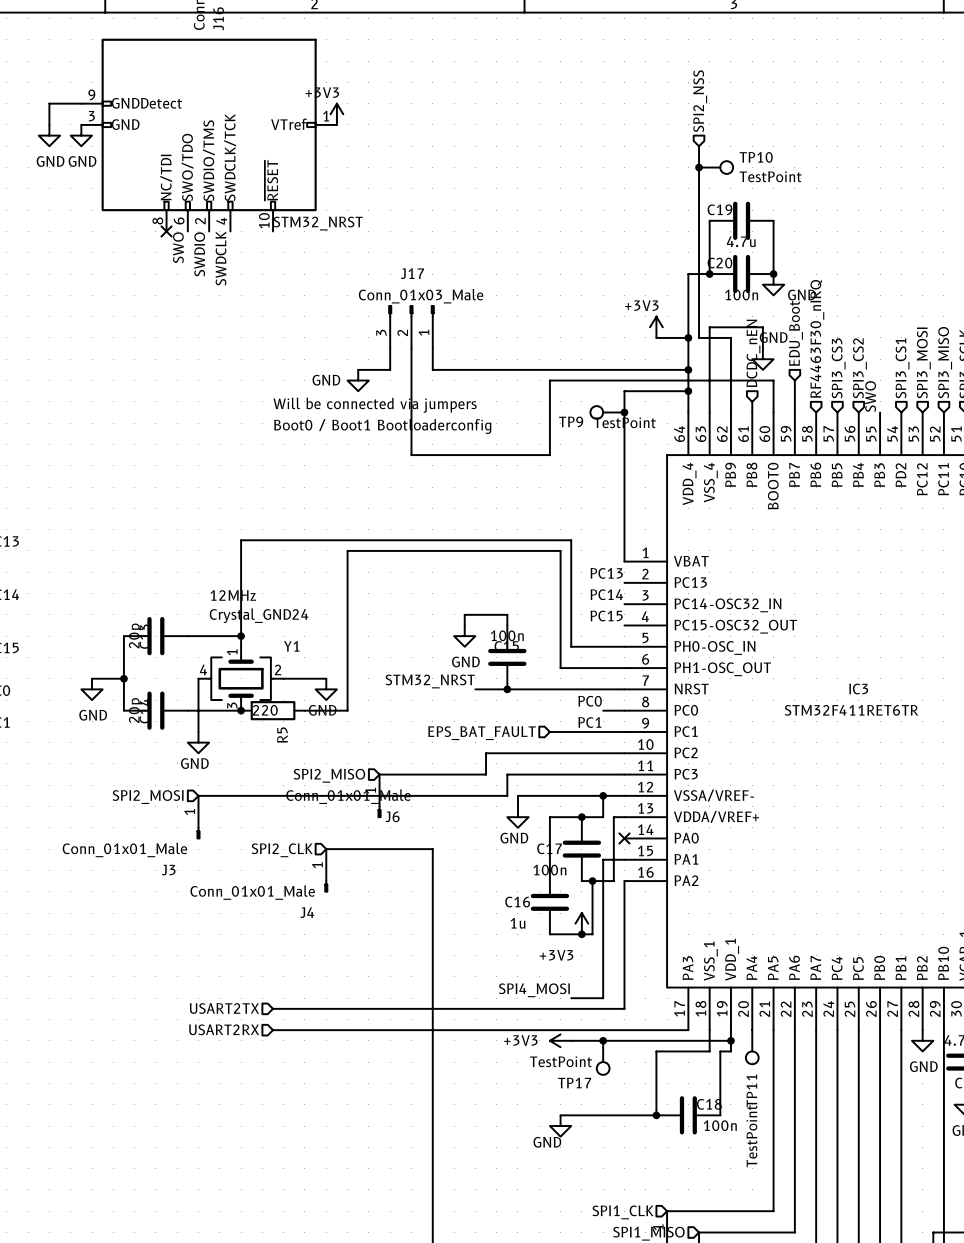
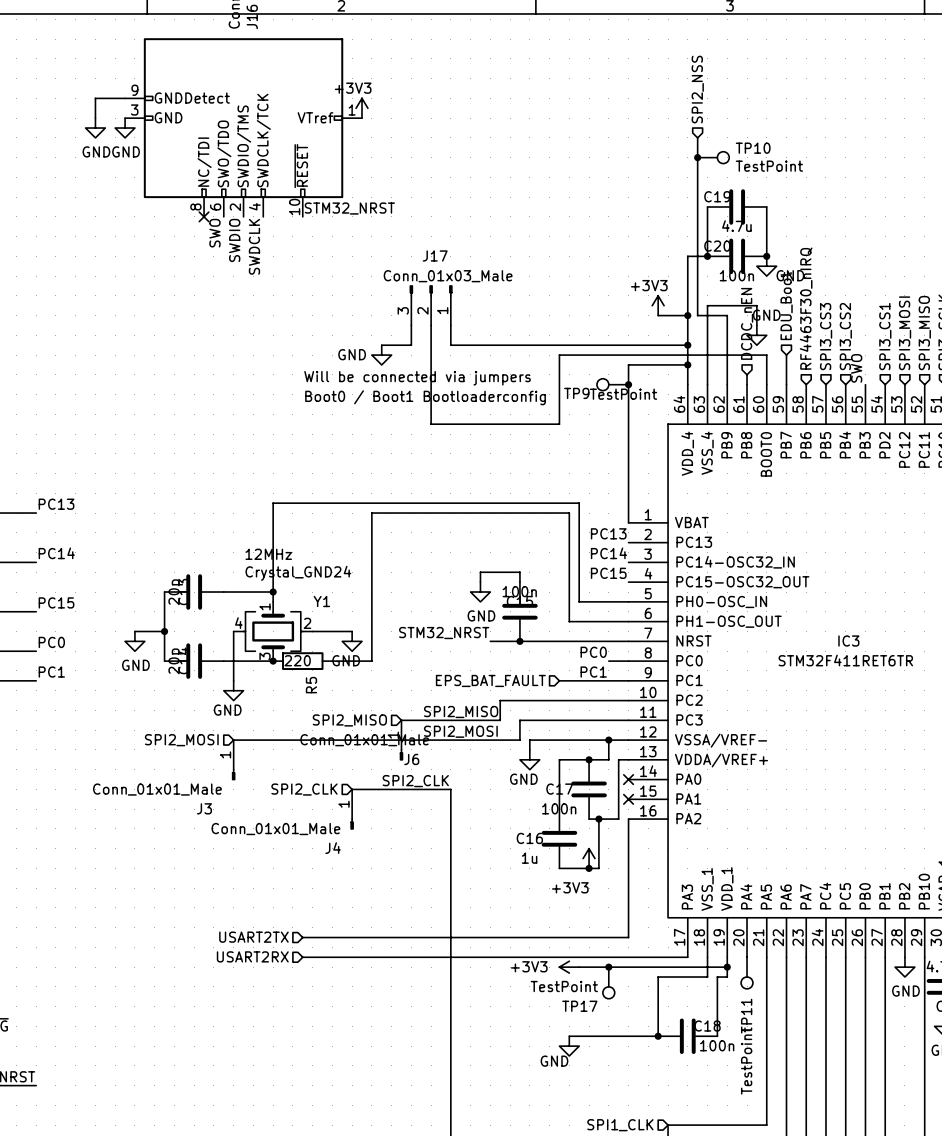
label: none -> SPI2_MISO (461, 712)
label: none -> SPI2_MOSI (460, 731)
label: none -> SPI2_CLK (415, 781)
wire: (624, 859) (603, 859) (603, 998) (571, 998) -> none
no-connect mark: none -> (628, 799)
label: SPI4_MOSI (534, 990) -> none

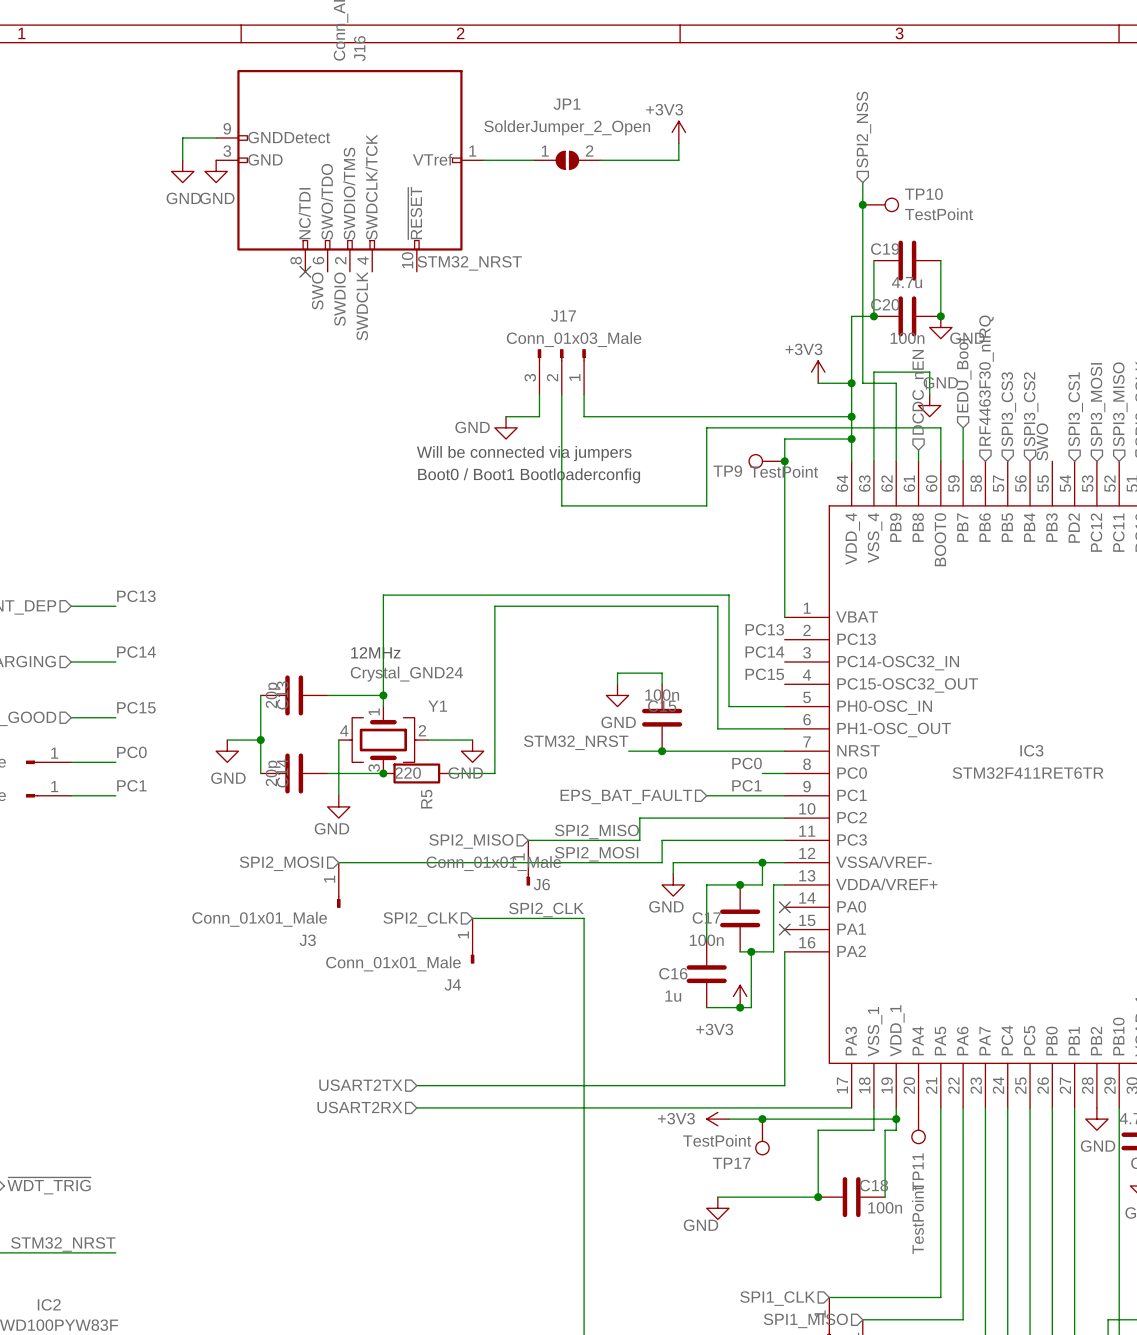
wire: none -> (678, 143) (678, 160) (600, 160)
power symbol position: +3V3 (362, 108) -> +3V3 (678, 132)
wire: none -> (483, 160) (533, 160)
JP1: none -> SolderJumper_2_Open (567, 160)

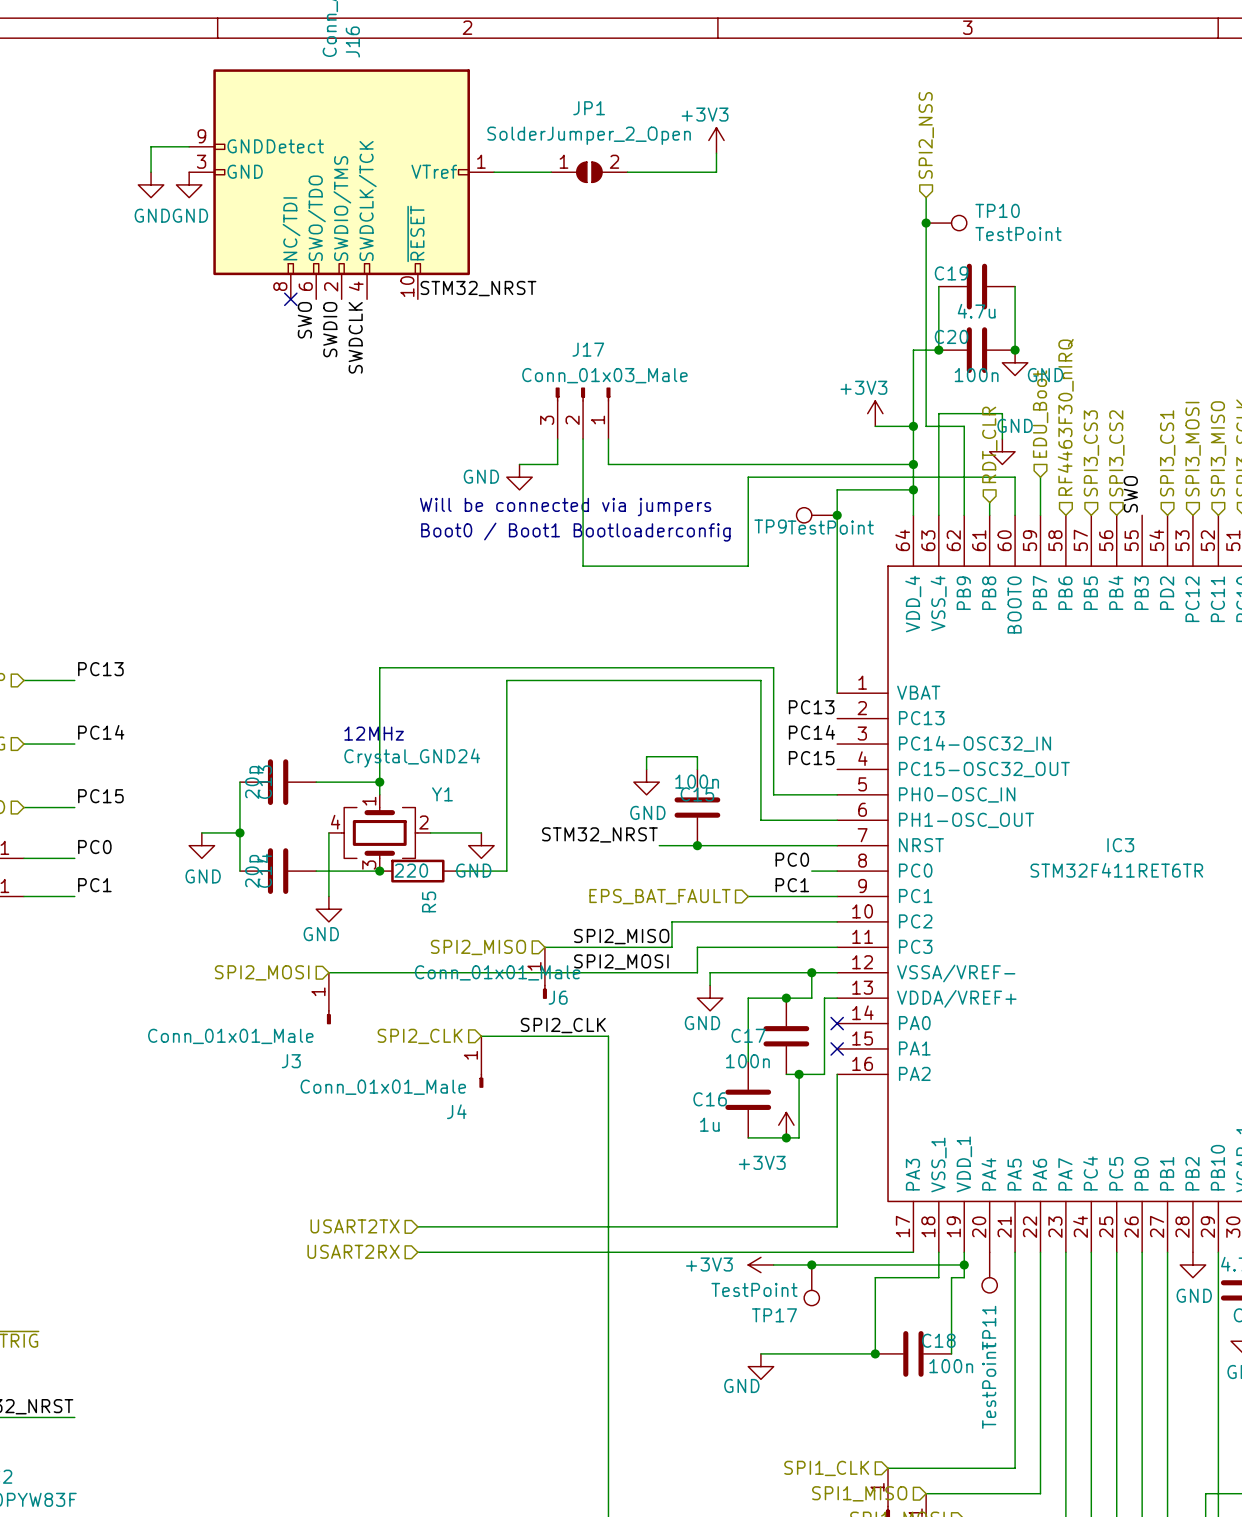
hierarchical label: DCDC_nEN (919, 392) -> RDT_CLR (989, 444)

